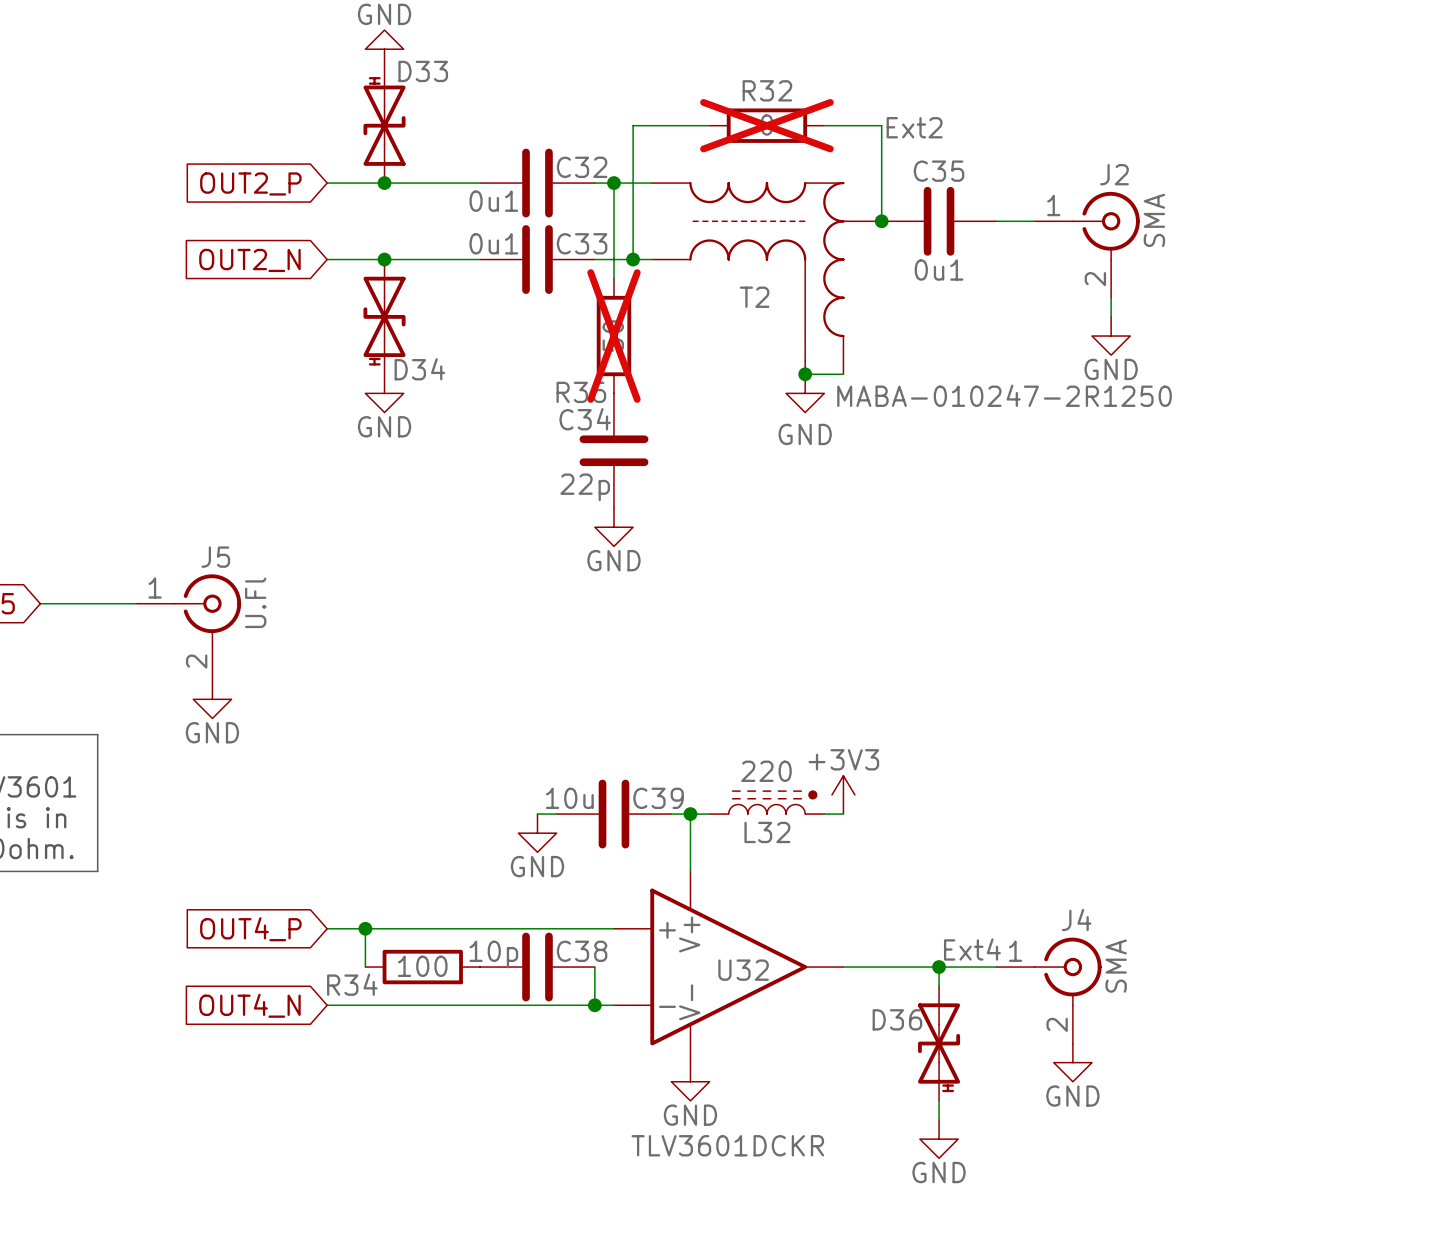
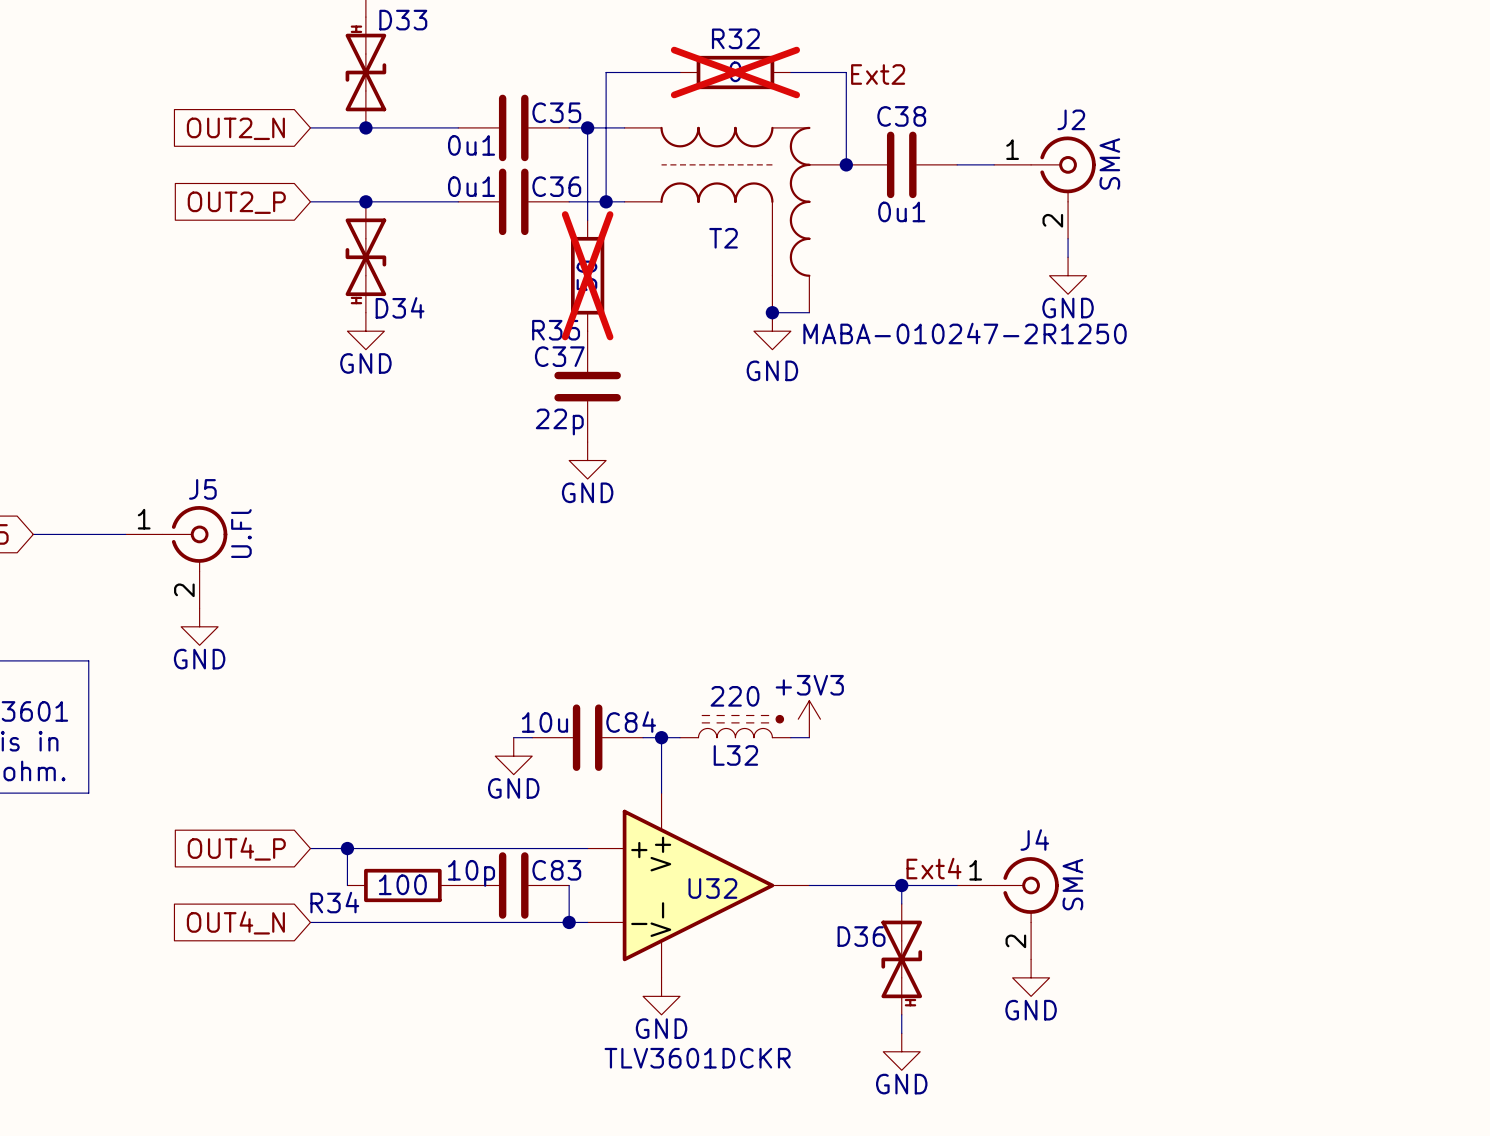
C32 name: C32 (582, 167) -> C35 (556, 112)
C35 name: C35 (939, 171) -> C38 (901, 116)
global label: OUT2_P (250, 183) -> OUT2_N (235, 128)
C33 name: C33 (582, 243) -> C36 (556, 186)
global label: OUT2_N (249, 260) -> OUT2_P (236, 202)
C34 name: C34 (585, 419) -> C37 (559, 356)
C39 name: C39 (658, 798) -> C84 (631, 722)
C38 name: C38 (582, 951) -> C83 (556, 870)

